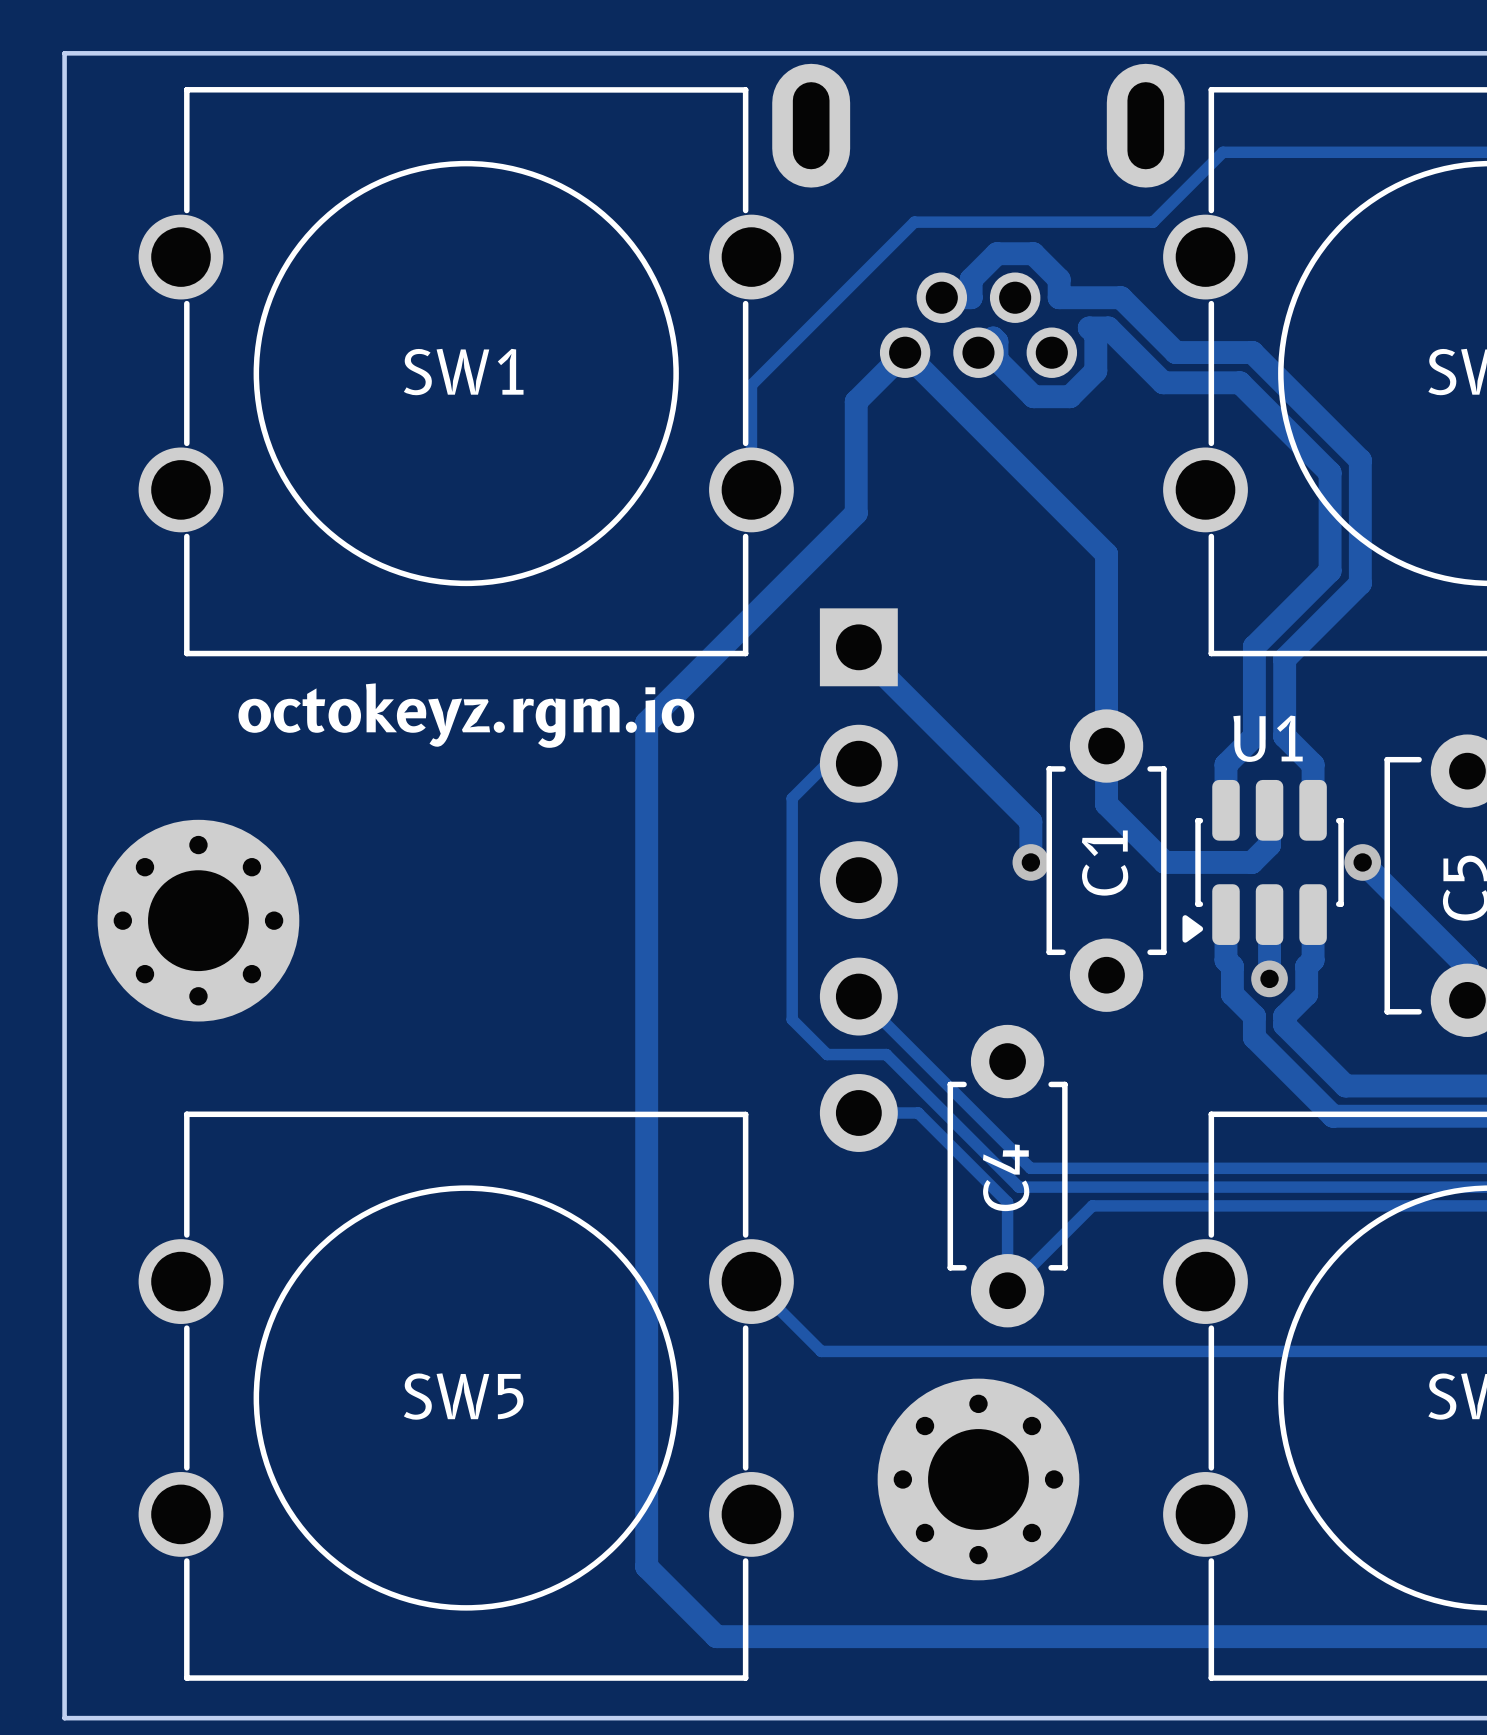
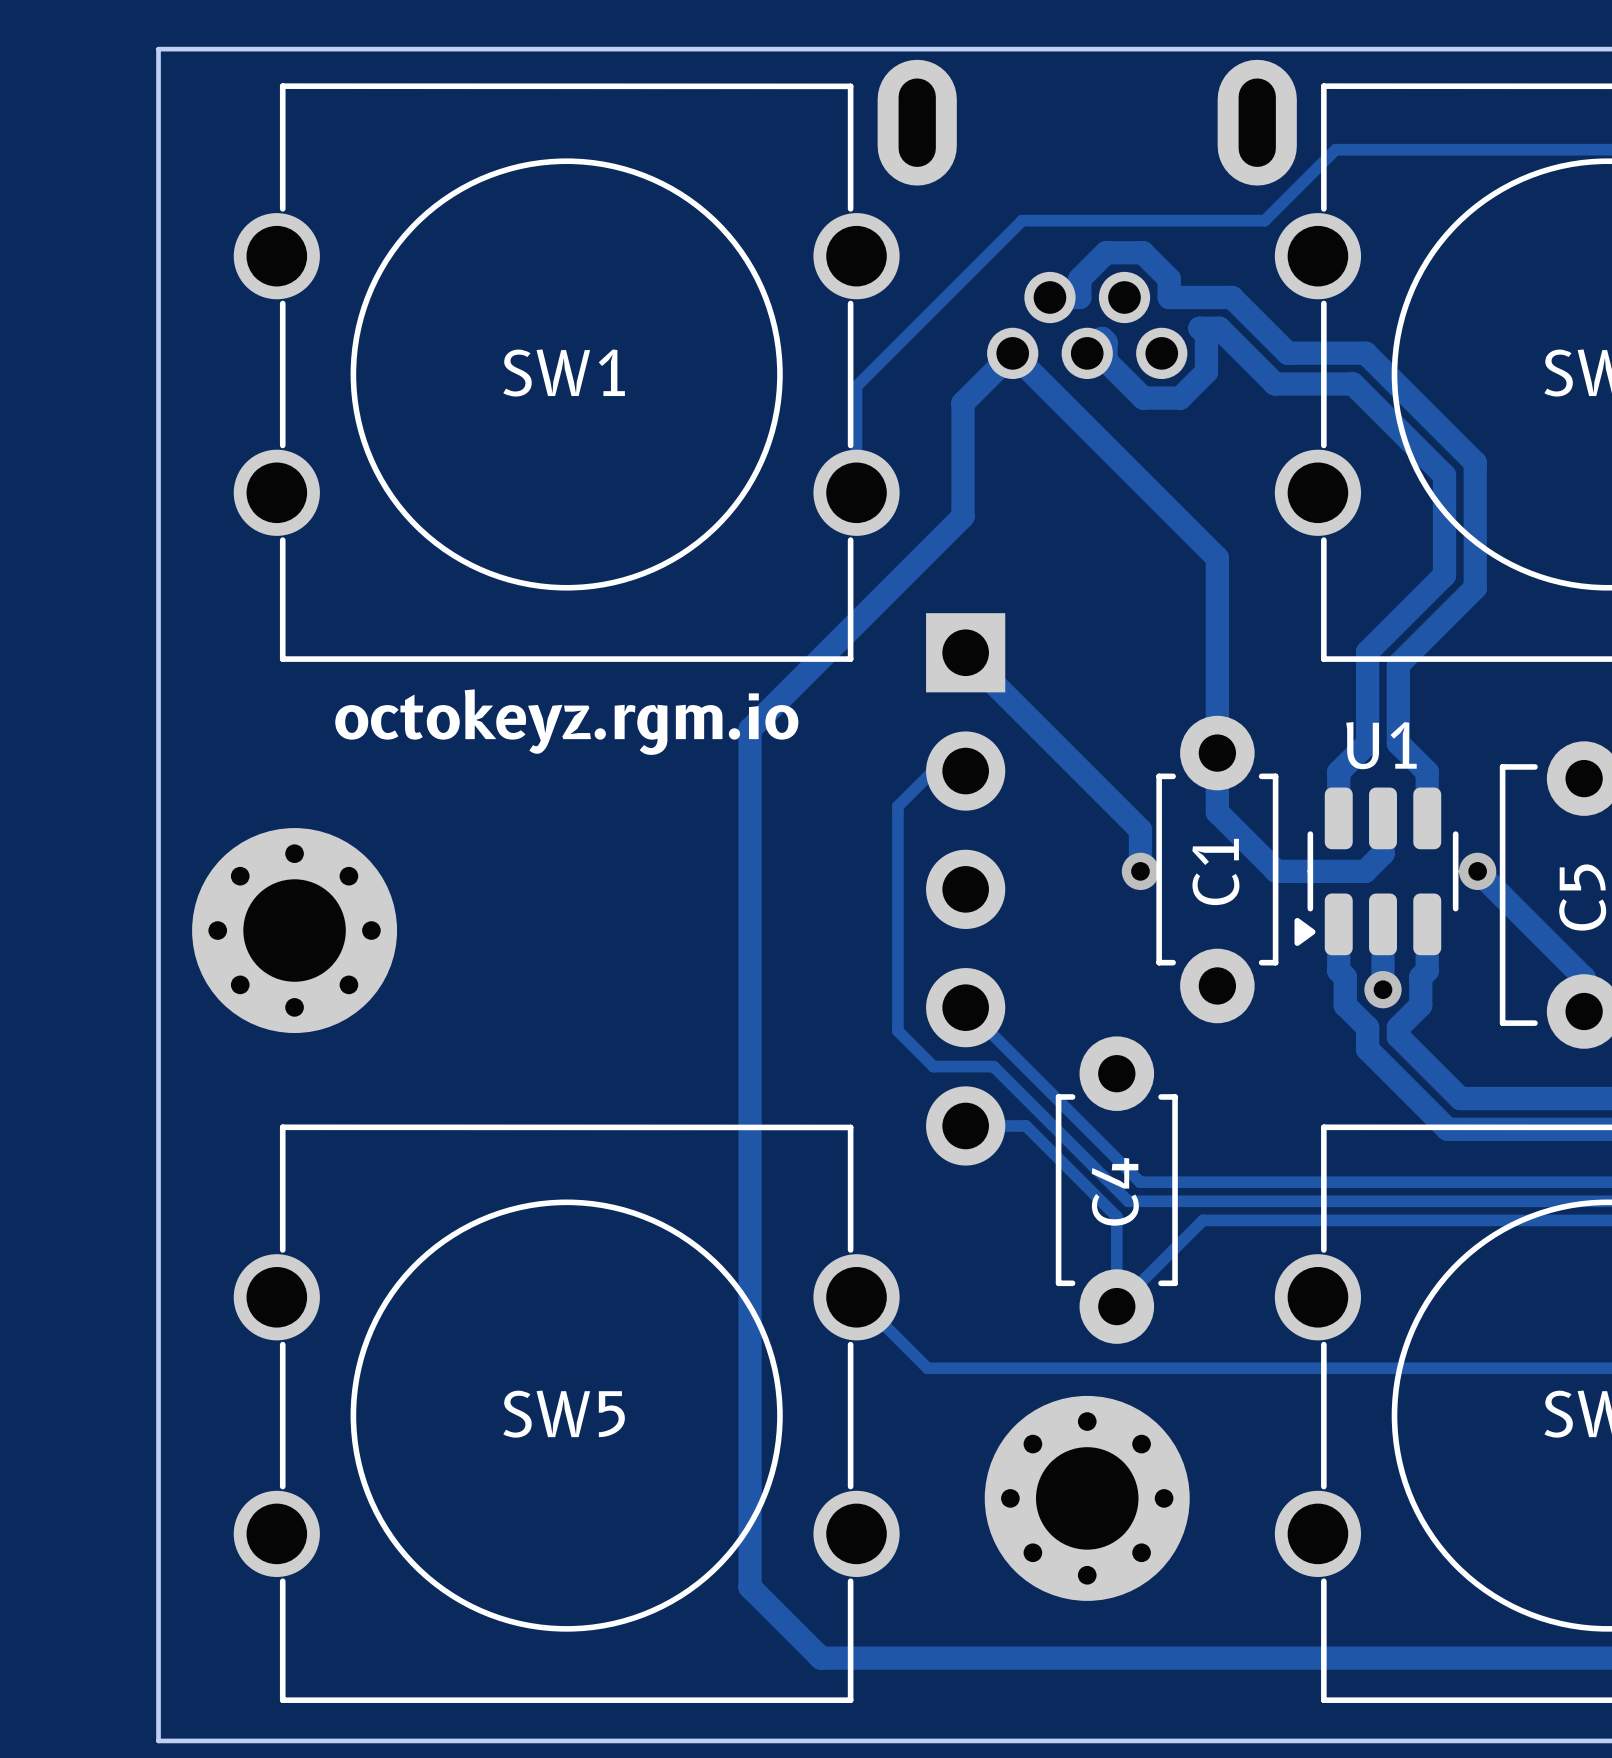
U1 footprint: [1182, 779, 1344, 945] -> [1294, 787, 1459, 956]

